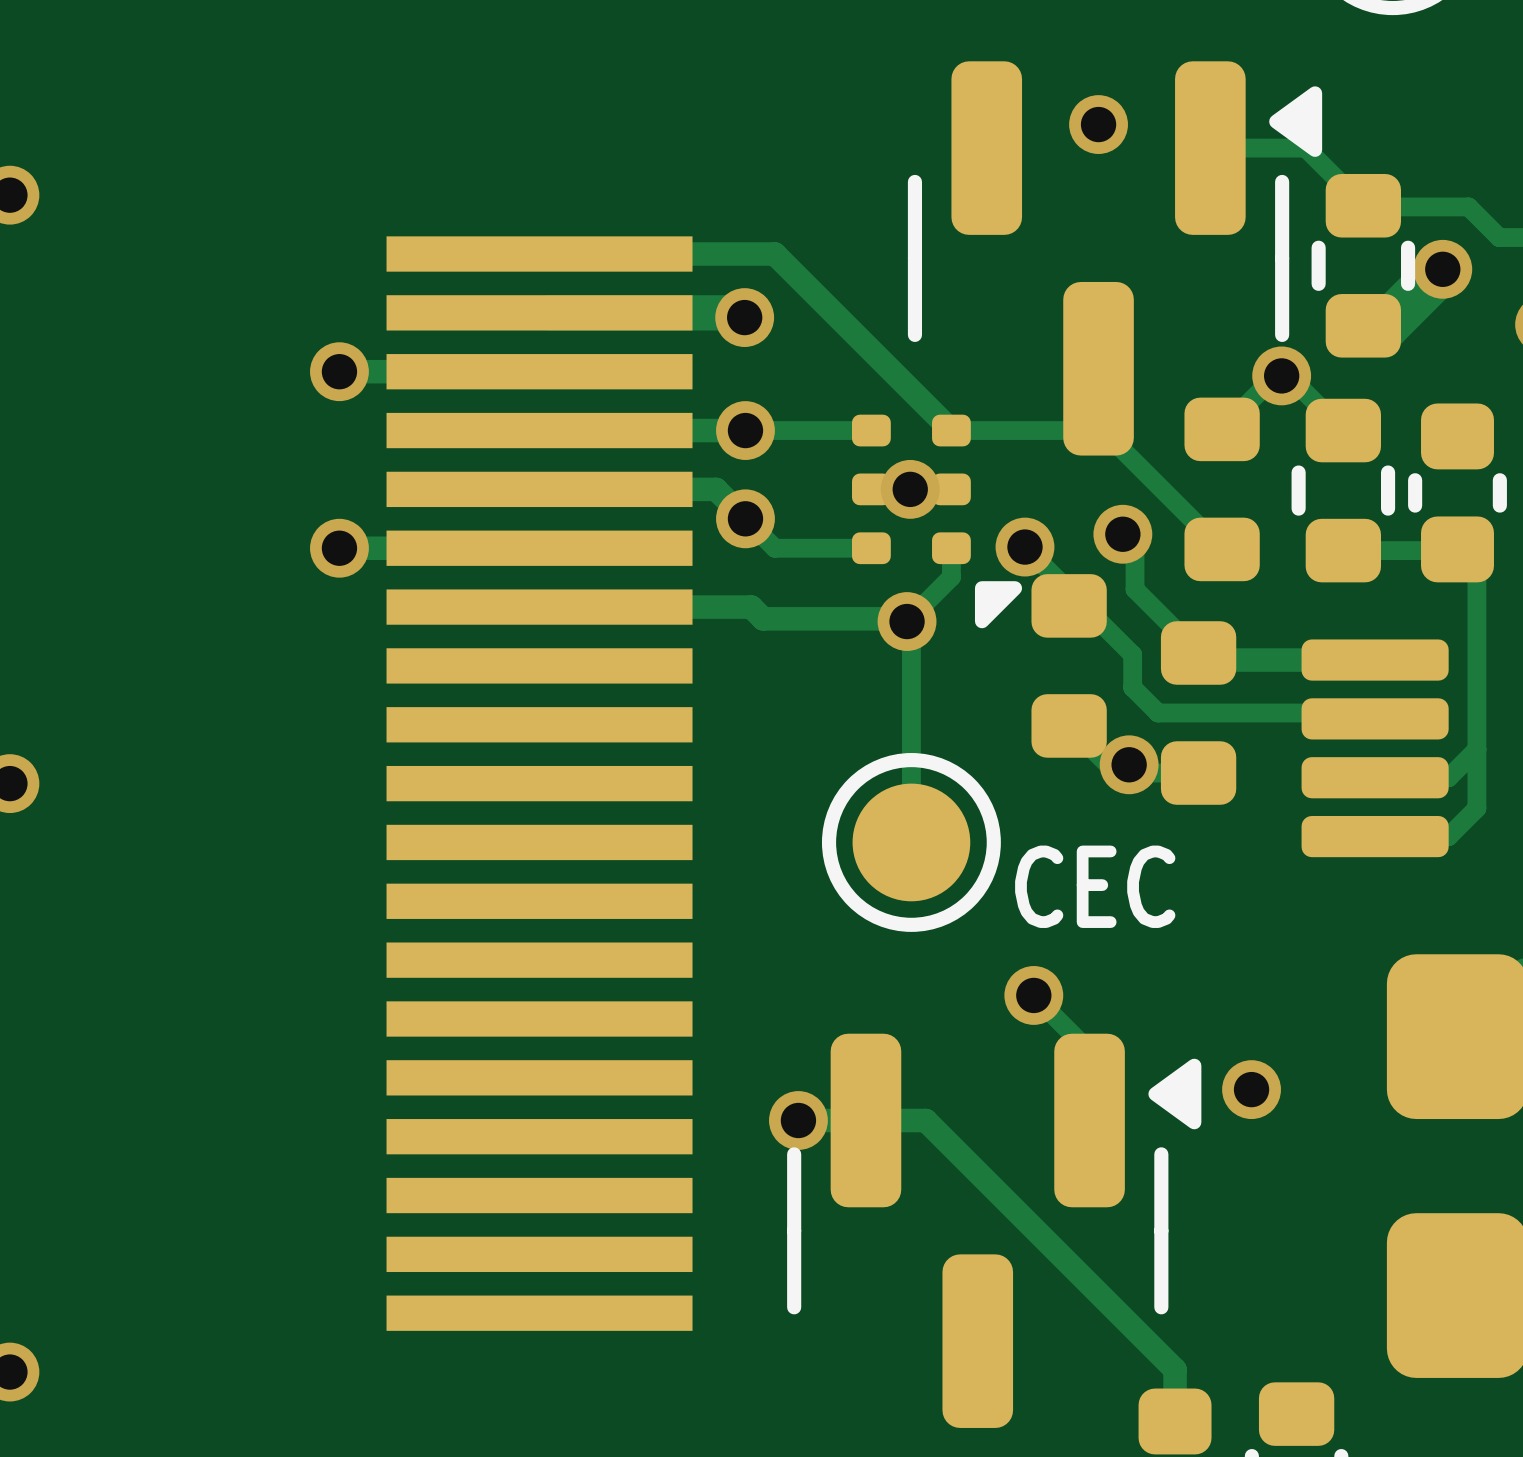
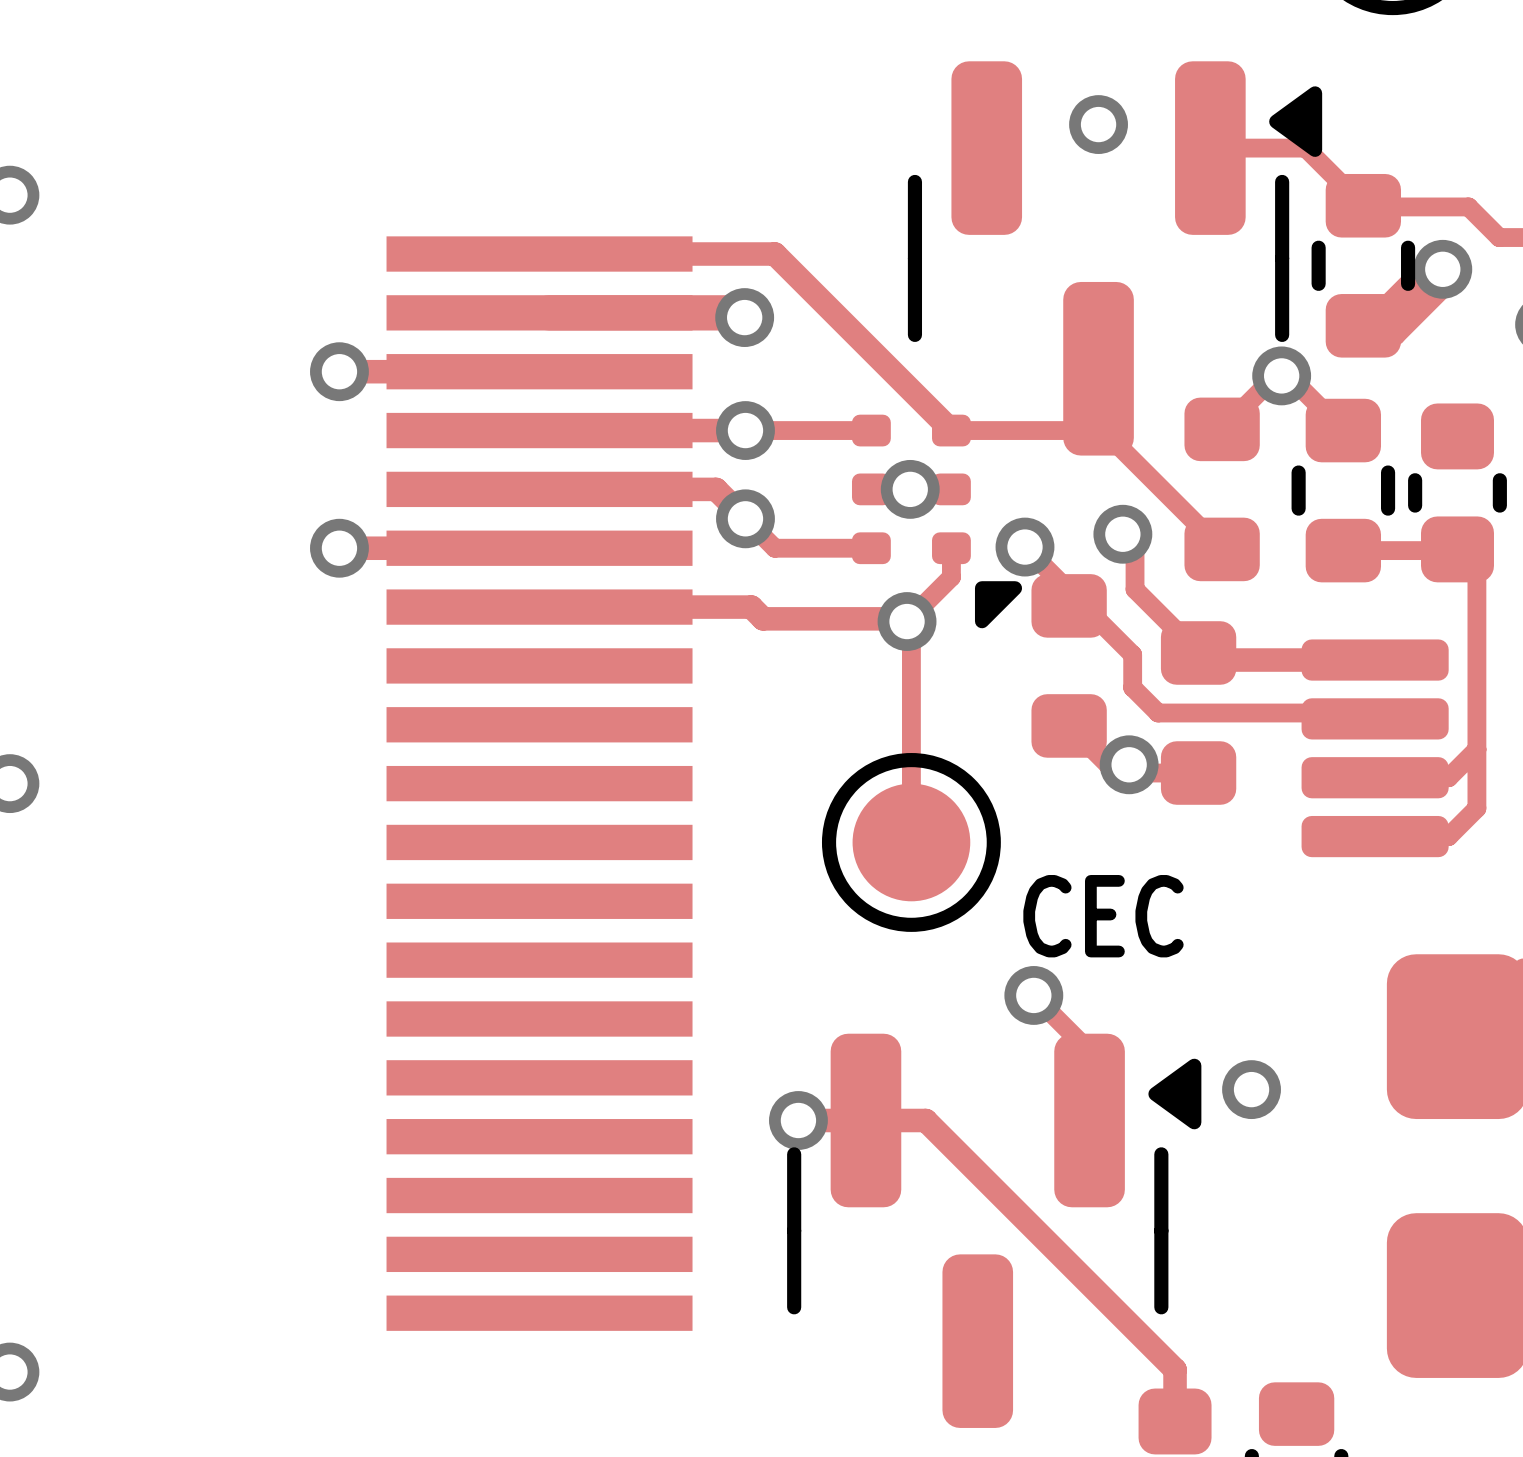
text position: CEC (1095, 886) -> CEC (1103, 916)

